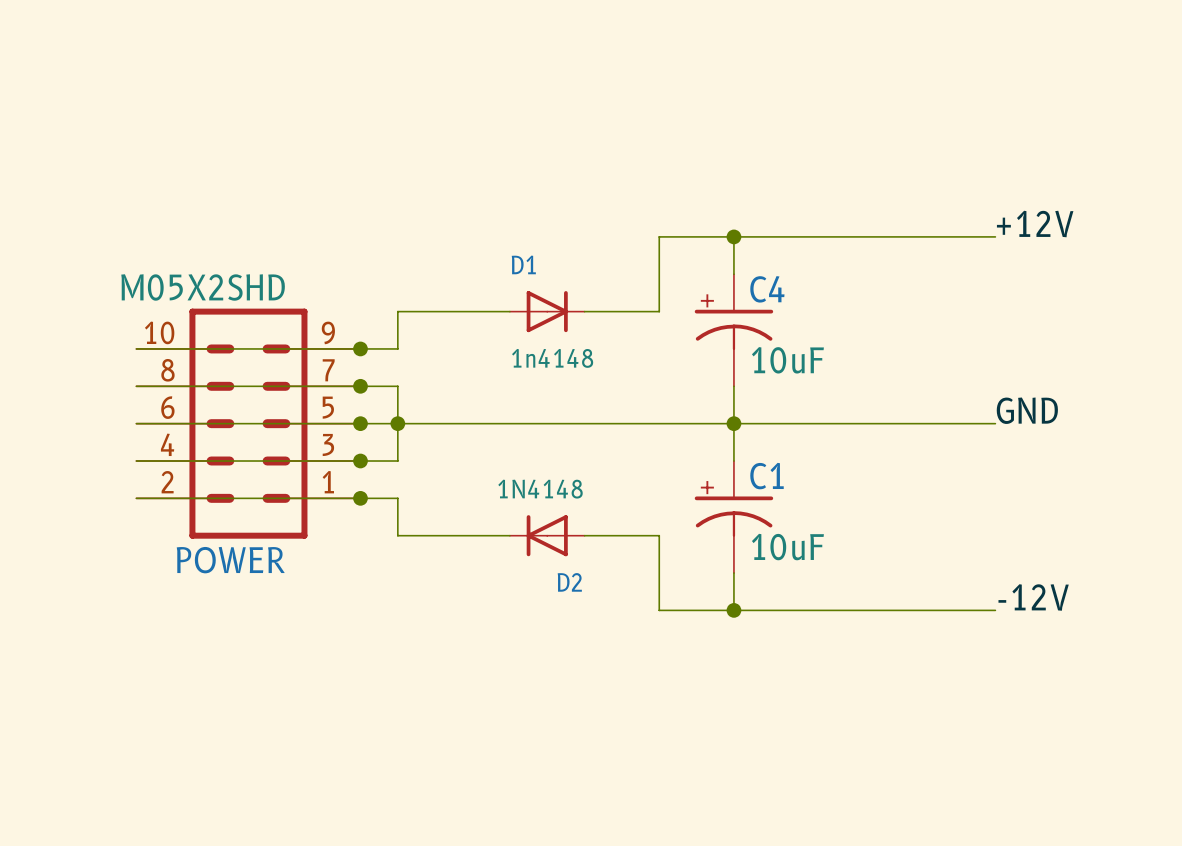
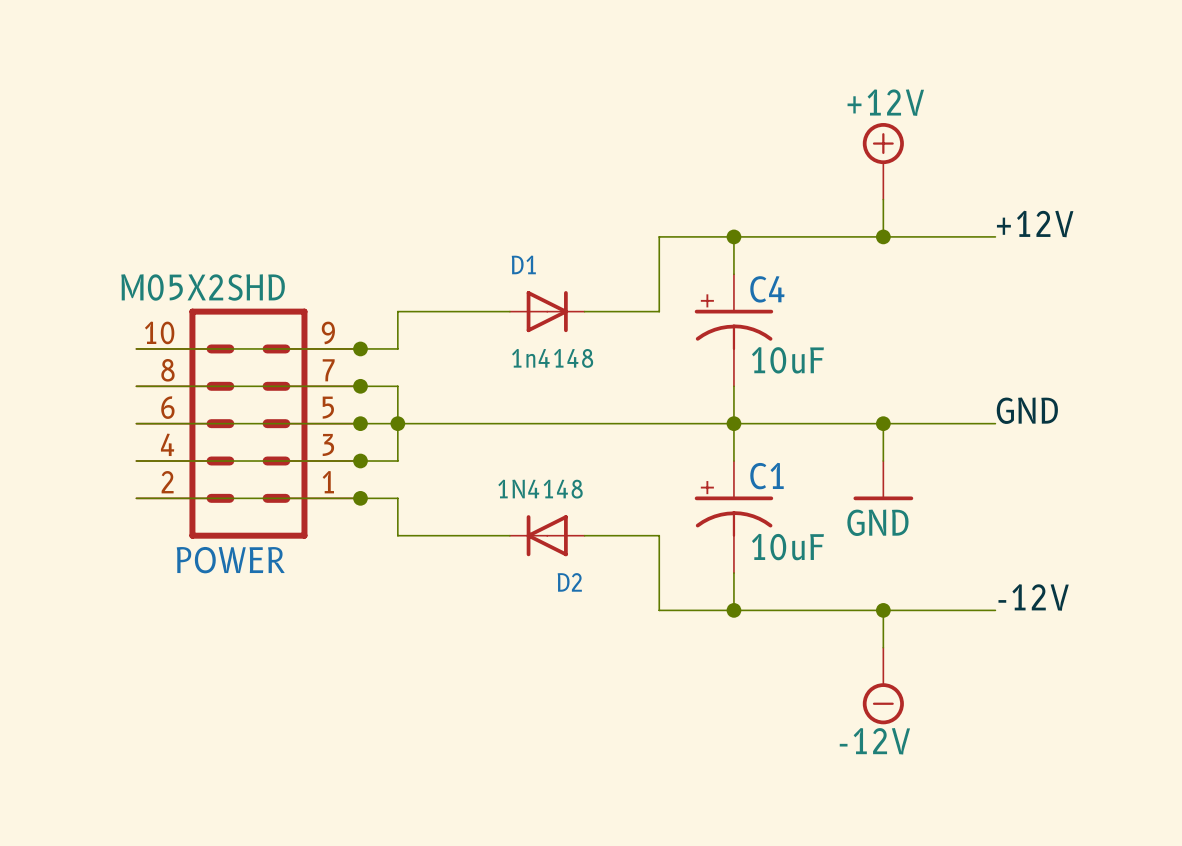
power symbol: none -> +12V (883, 161)
wire: none -> (883, 199) (883, 236)
junction: none -> (883, 236)
wire: none -> (883, 423) (883, 461)
junction: none -> (883, 423)
power symbol: none -> GND (883, 480)
wire: none -> (883, 610) (883, 647)
junction: none -> (883, 610)
power symbol: none -> -12V (883, 686)

